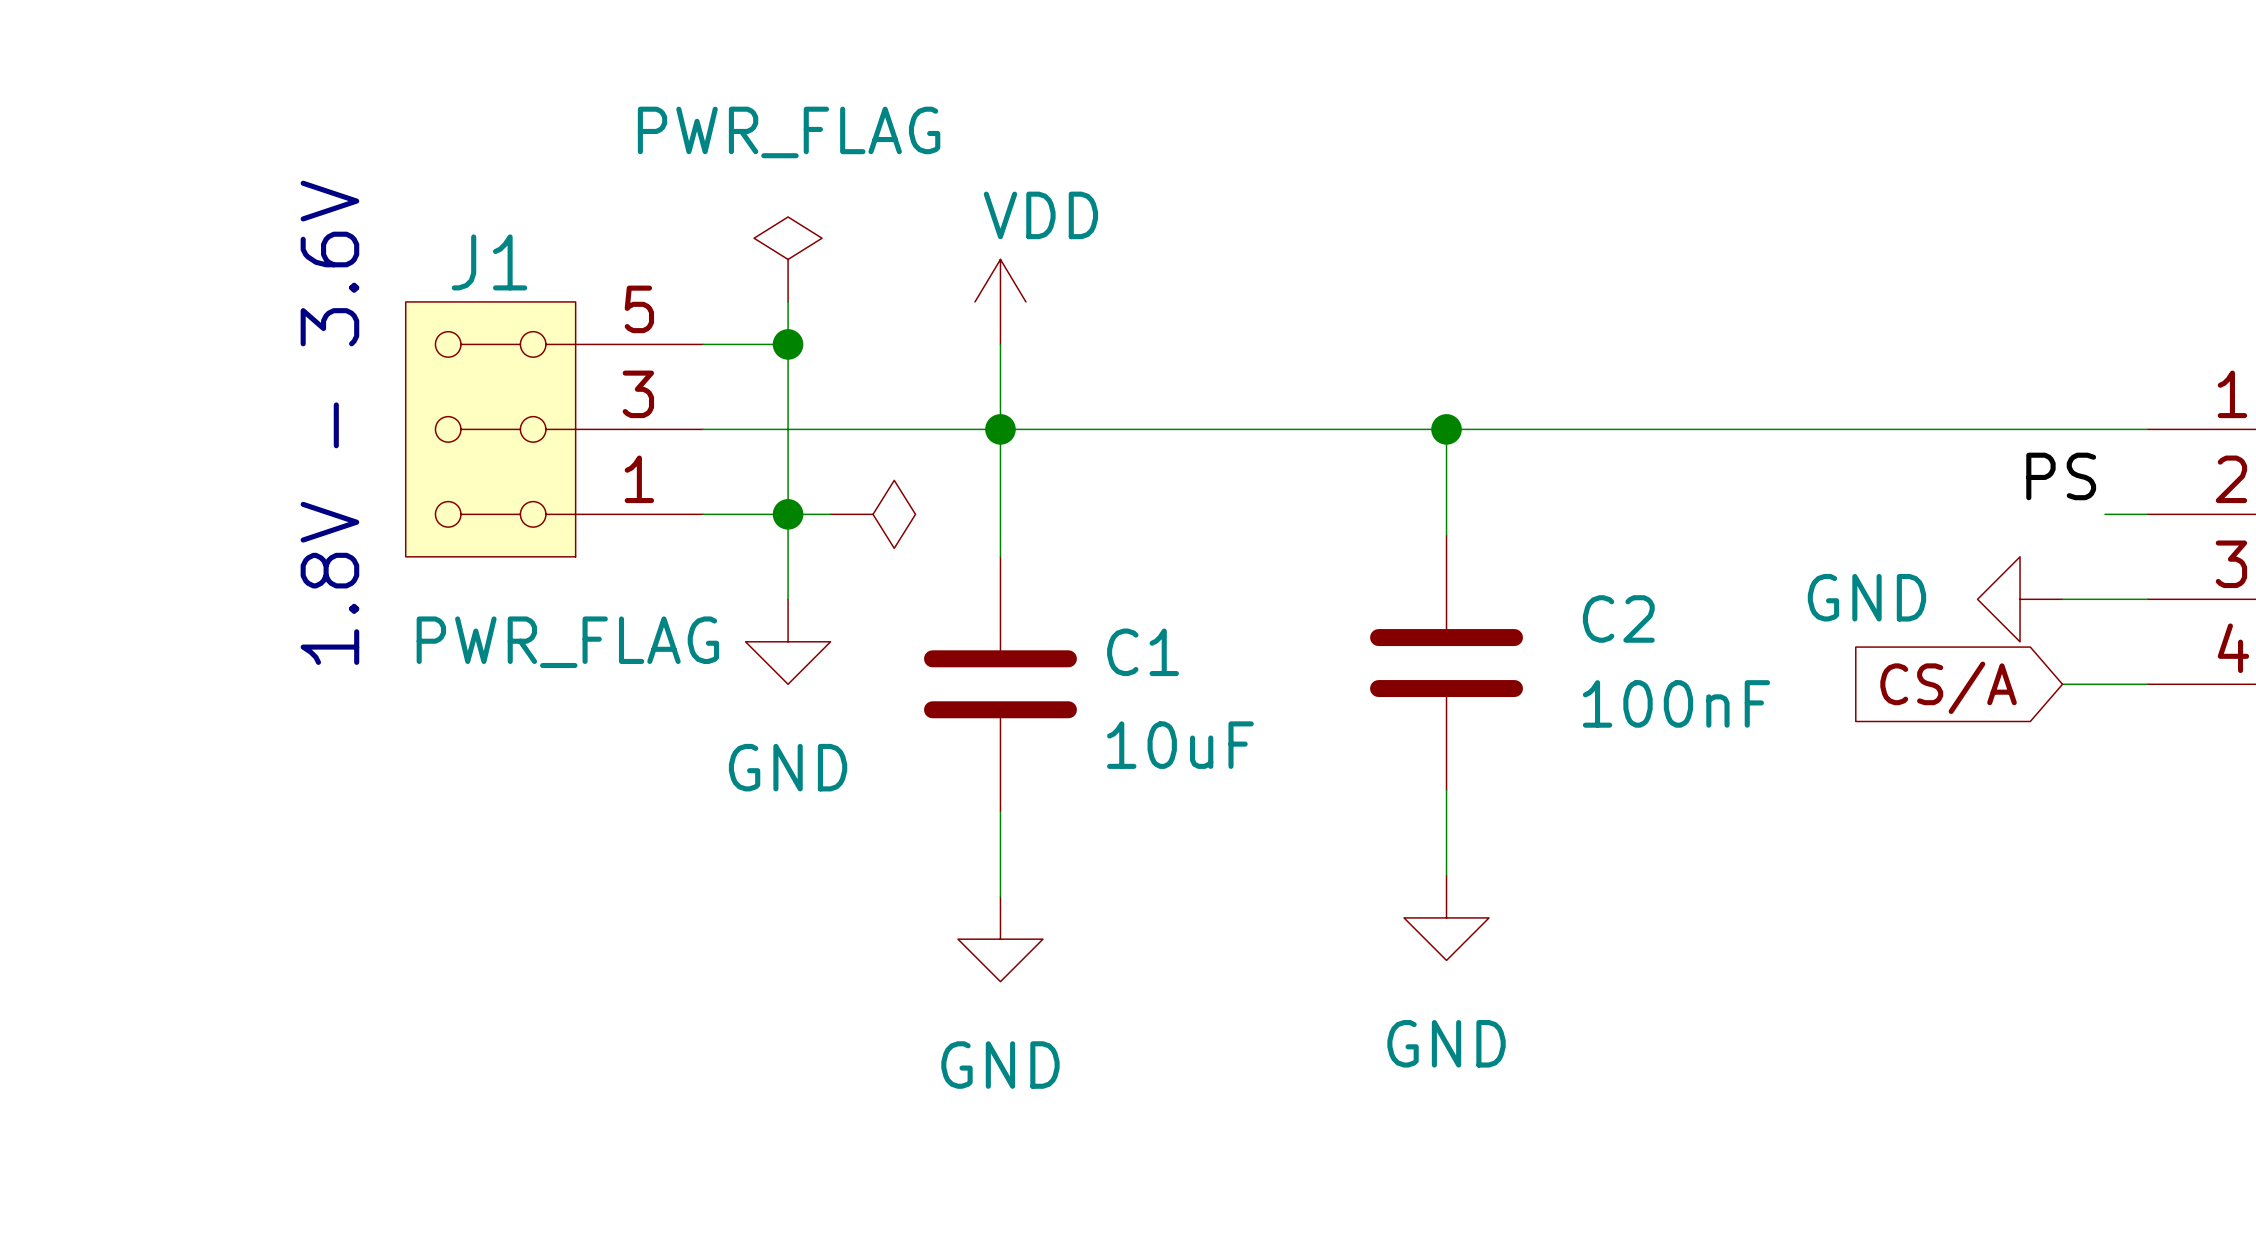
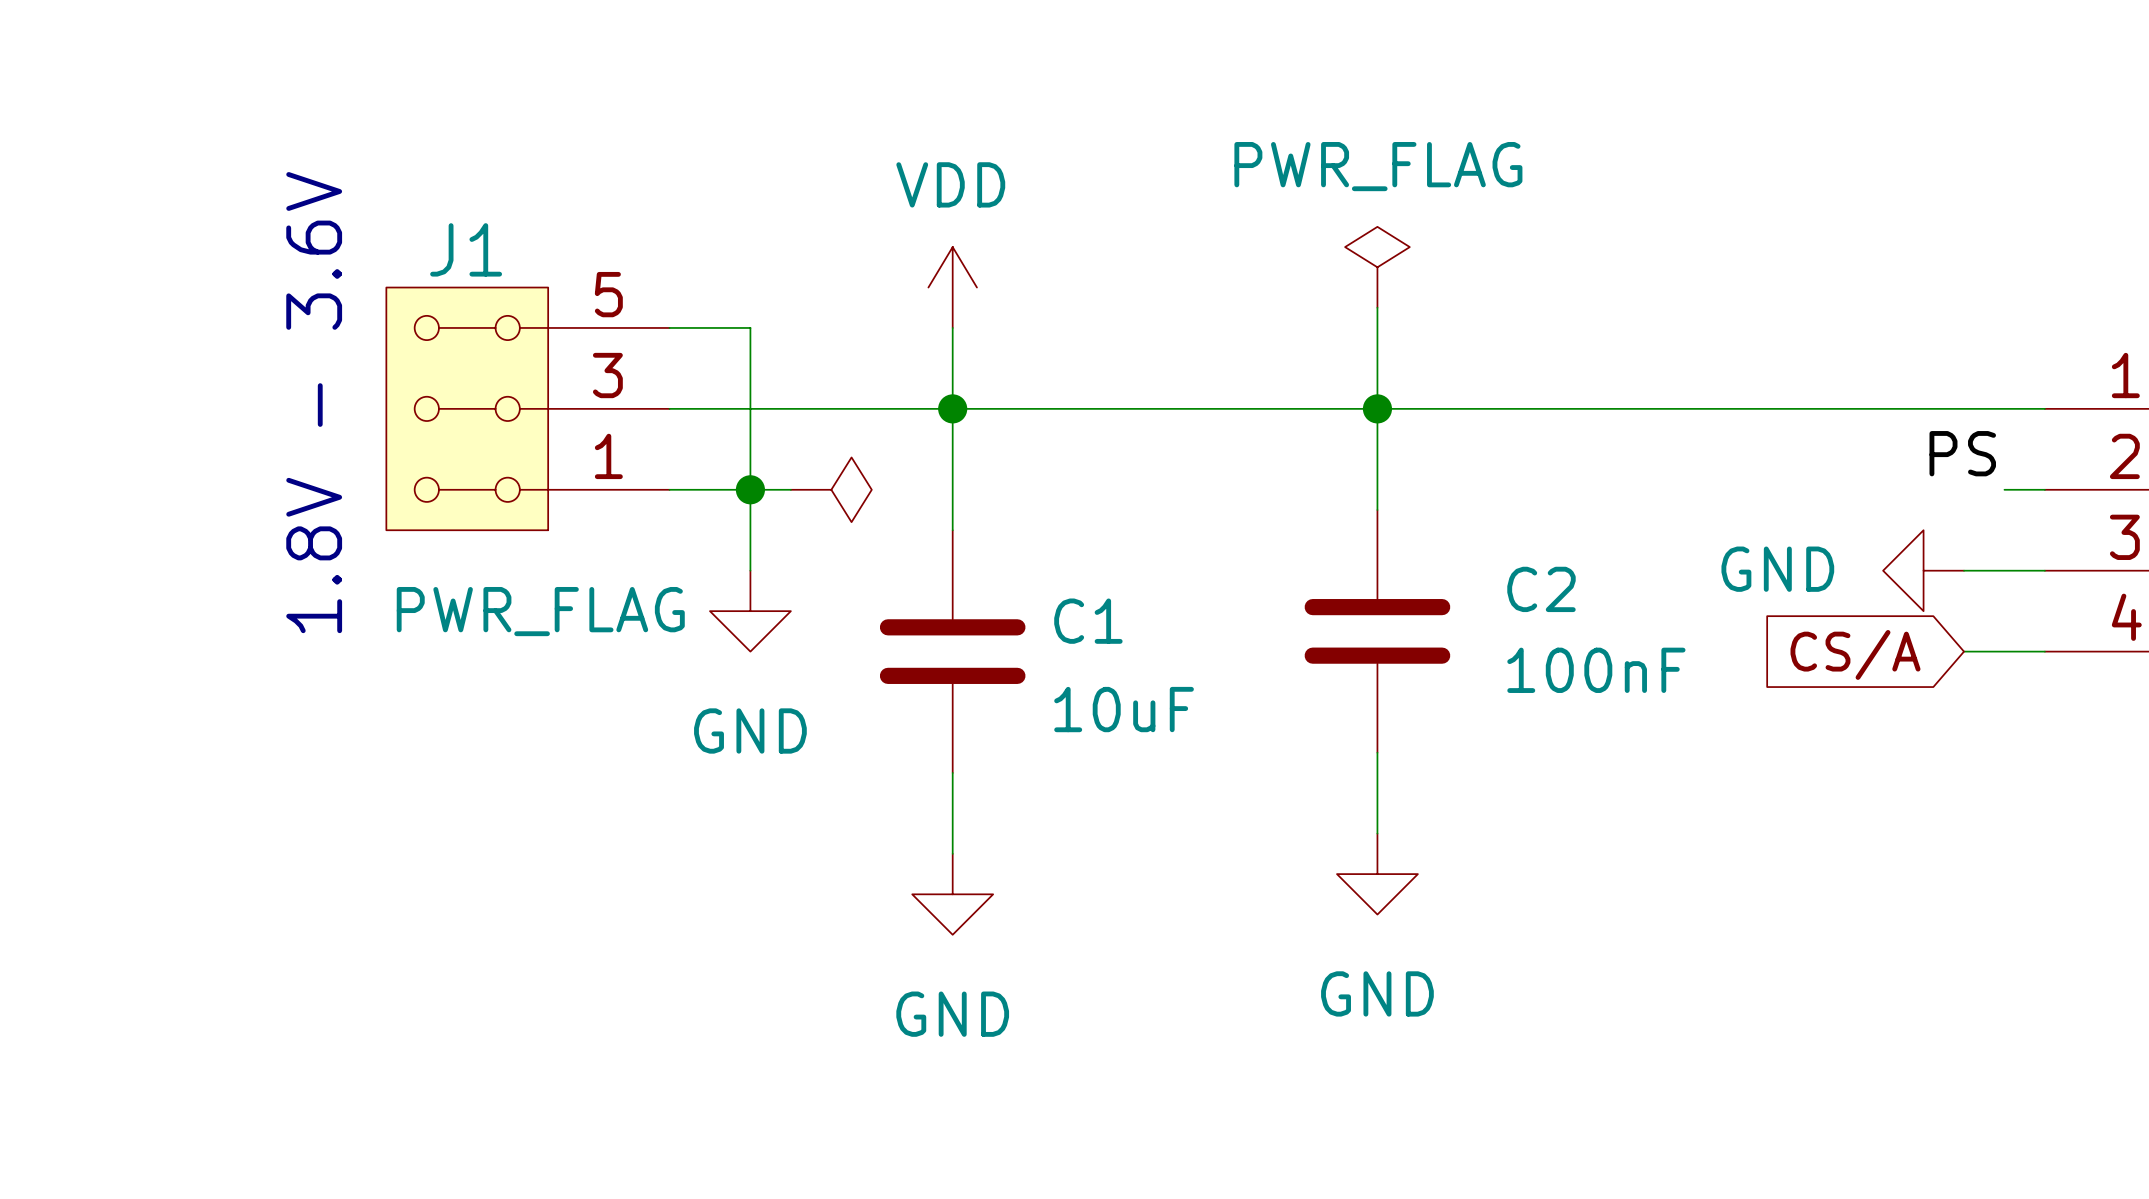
power symbol text position: PWR_FLAG (789, 132) -> PWR_FLAG (1378, 166)
power symbol text position: VDD (1040, 215) -> VDD (950, 184)
power symbol position: PWR_FLAG (788, 259) -> PWR_FLAG (1377, 267)
wire: (788, 301) (788, 344) -> none
wire: none -> (1377, 307) (1377, 408)
junction: (788, 344) -> none

